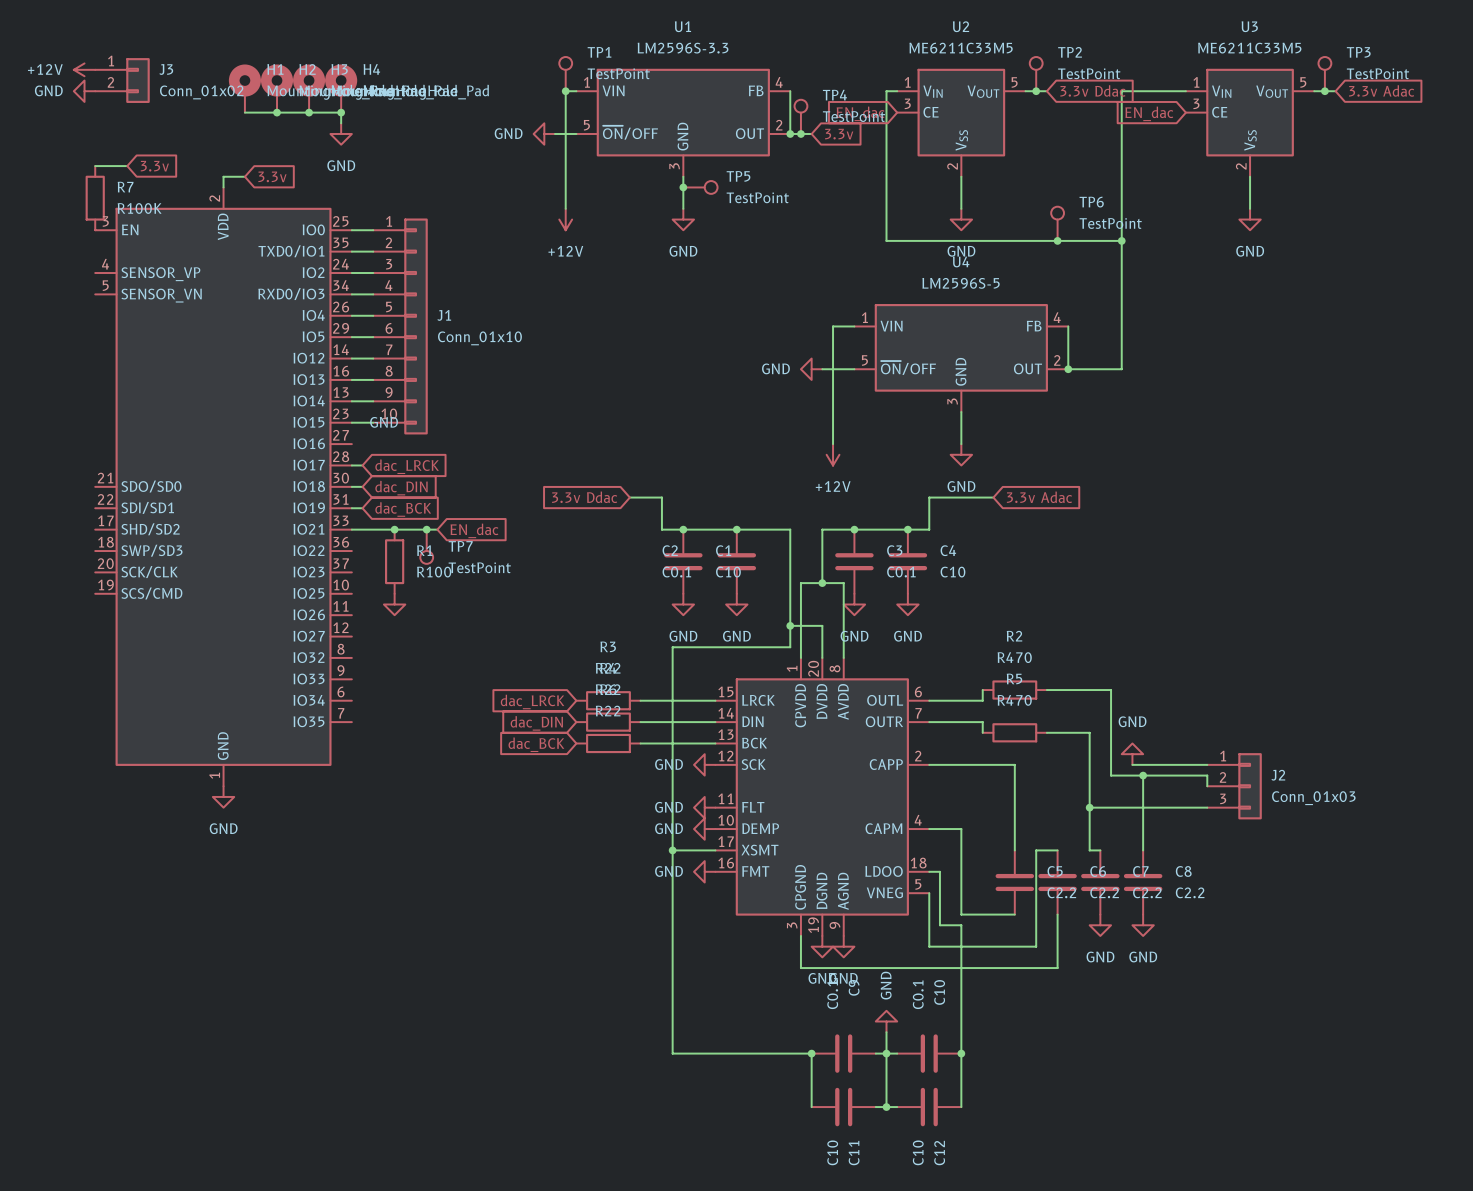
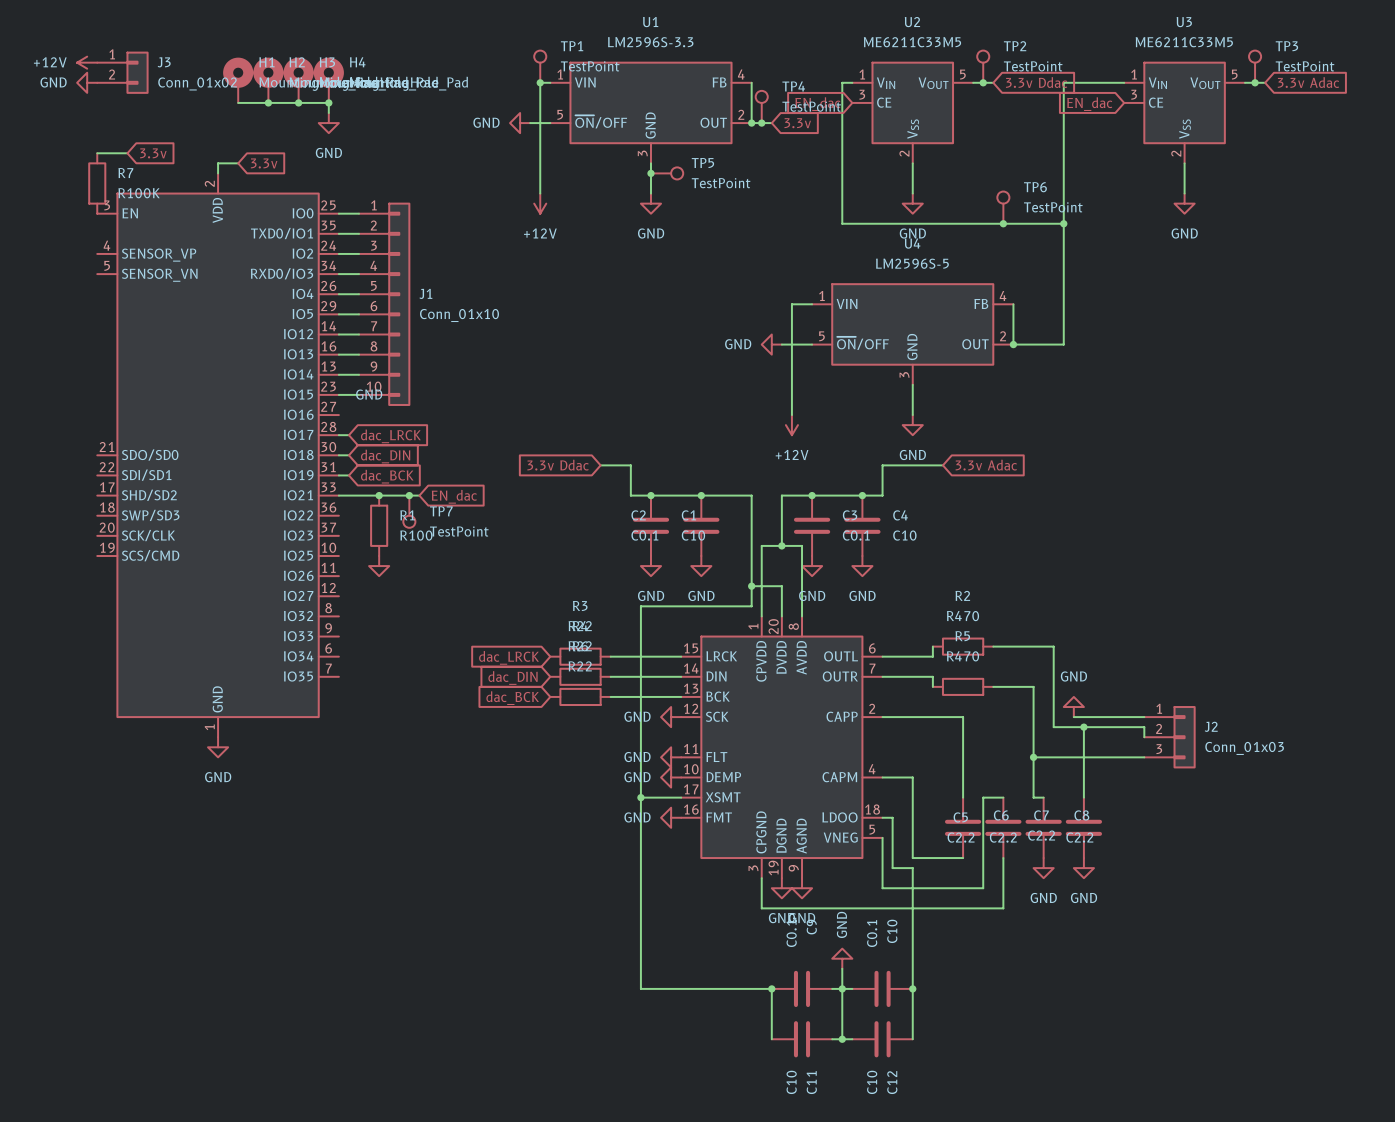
C5 name position: C5 (1055, 871) -> C5 (960, 817)
C6 name position: C6 (1098, 871) -> C6 (1001, 815)
C7 name position: C7 (1140, 871) -> C7 (1041, 815)
C8 name position: C8 (1183, 871) -> C8 (1081, 815)
C5 value position: C2.2 (1061, 892) -> C2.2 (961, 837)
C6 value position: C2.2 (1104, 892) -> C2.2 (1003, 837)
C7 value position: C2.2 (1147, 892) -> C2.2 (1041, 835)
C8 value position: C2.2 (1190, 892) -> C2.2 (1079, 837)

